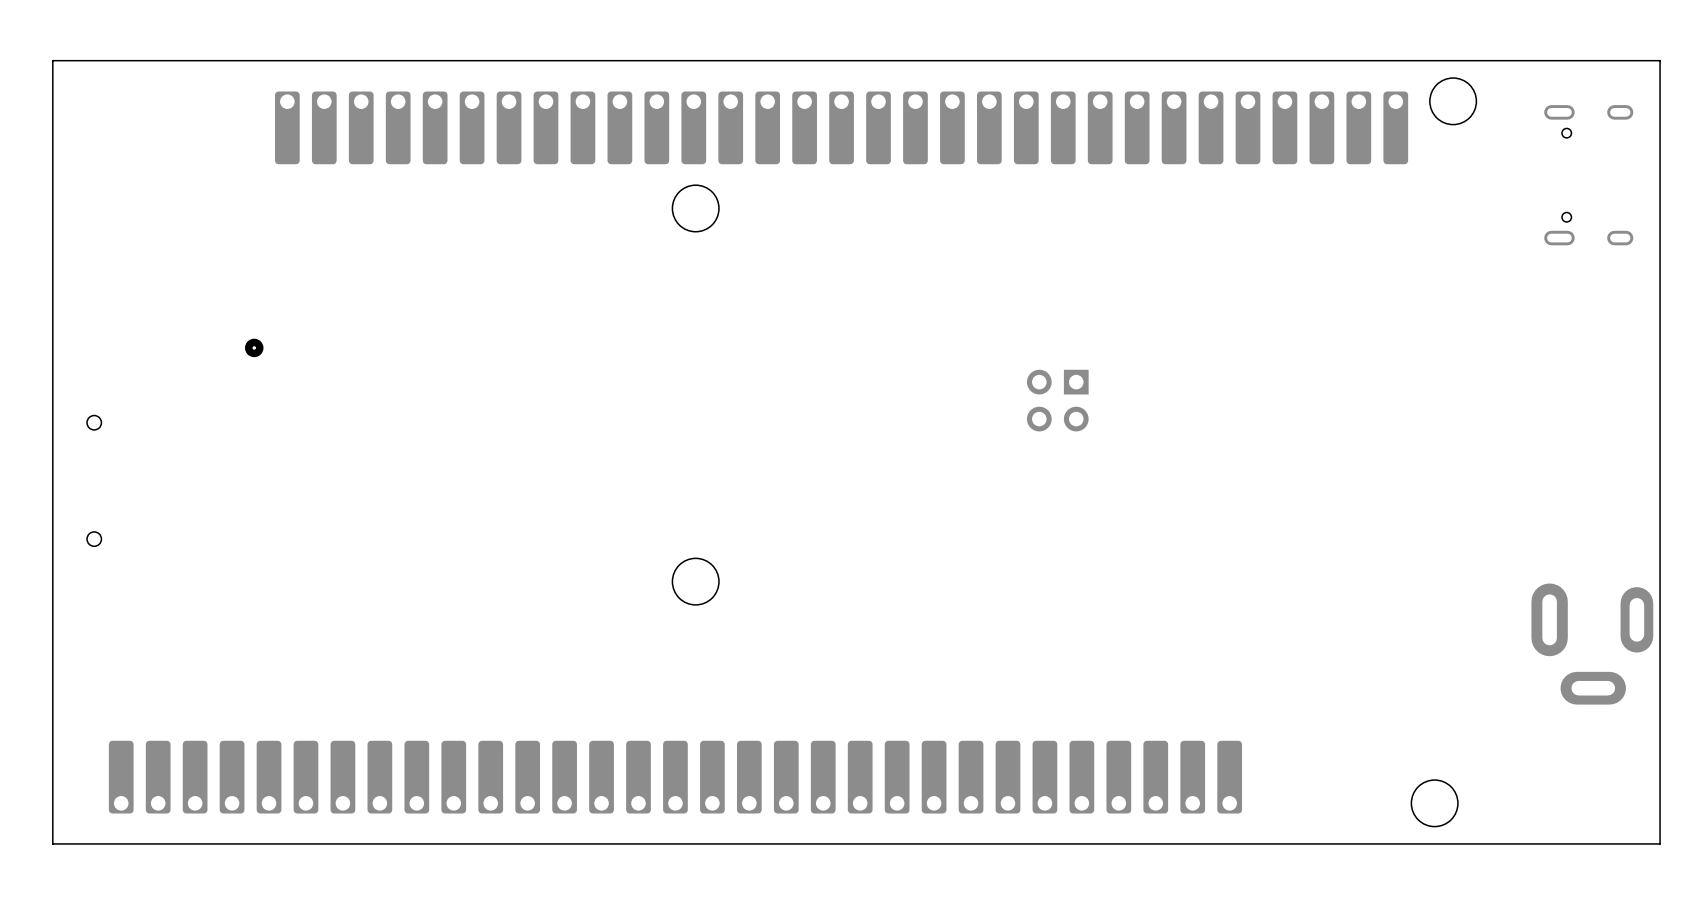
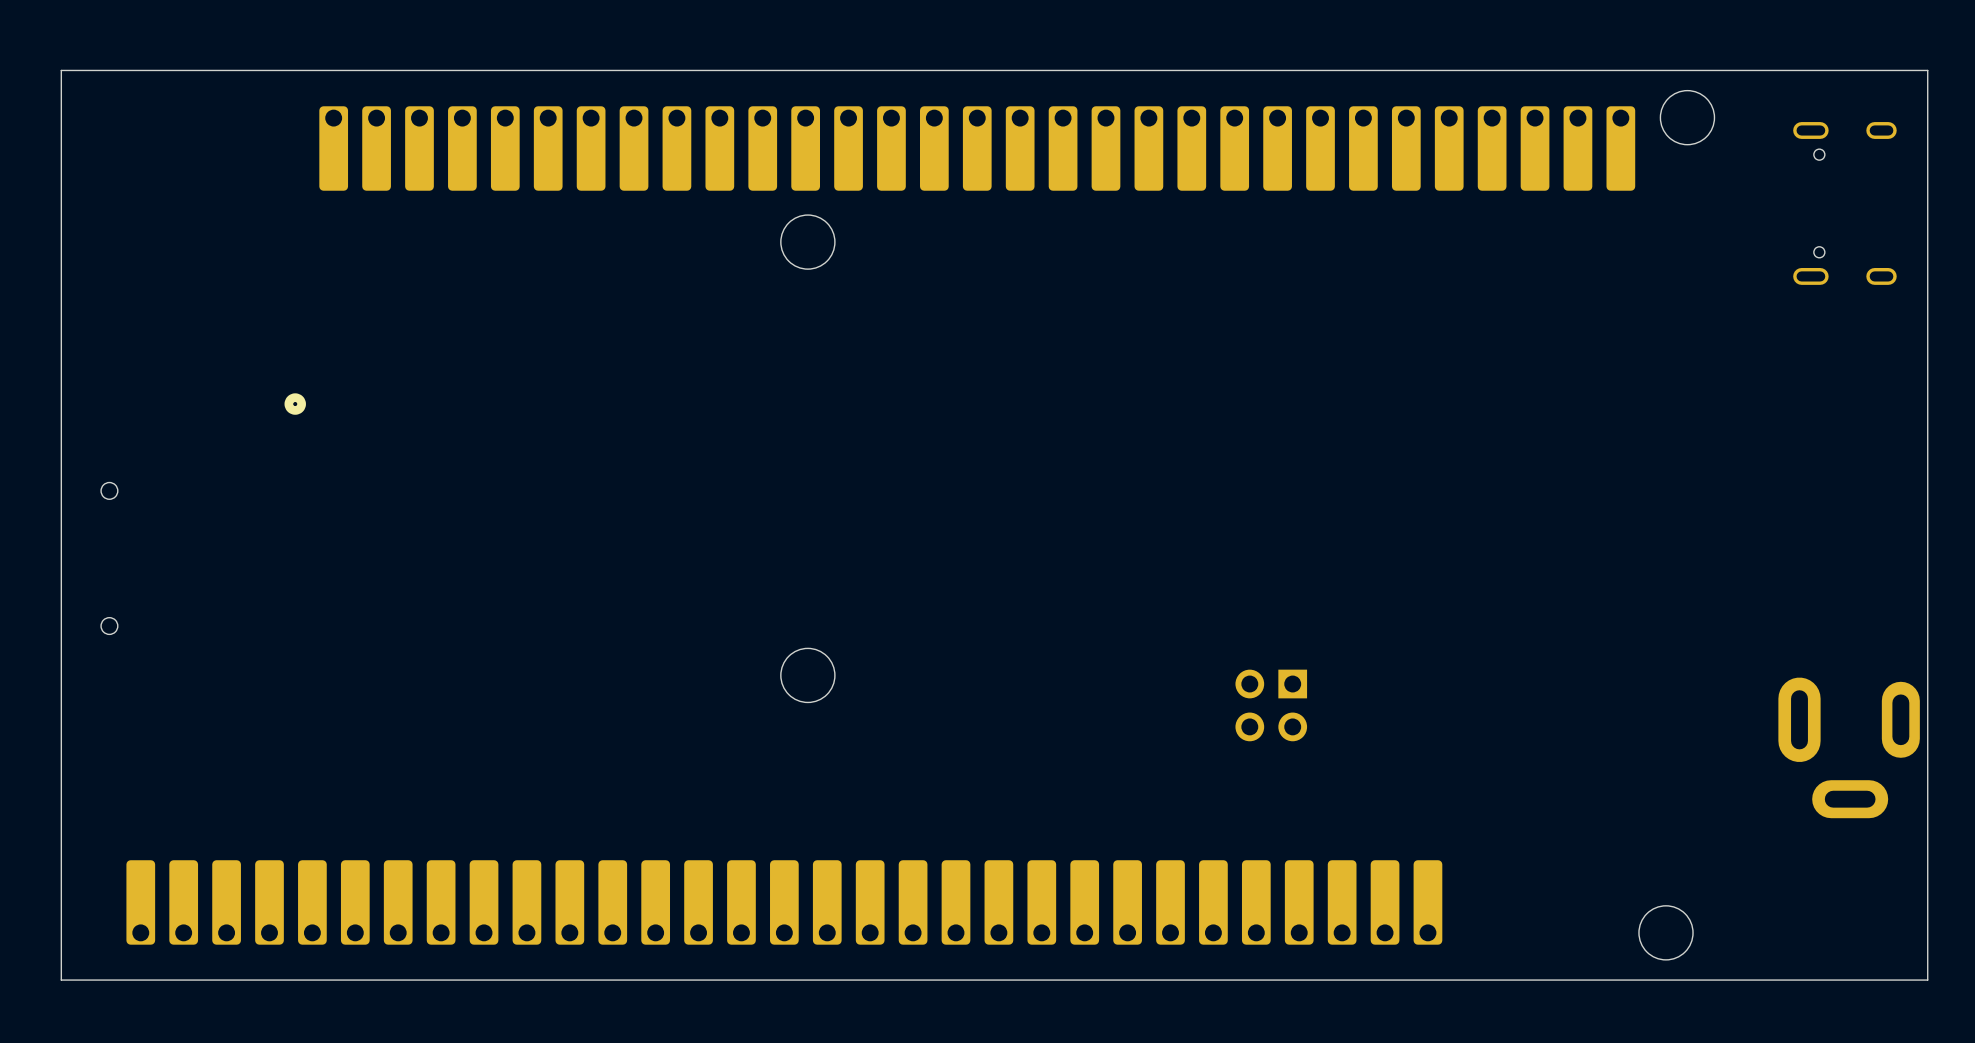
part position: (1057, 400) -> (1271, 705)

